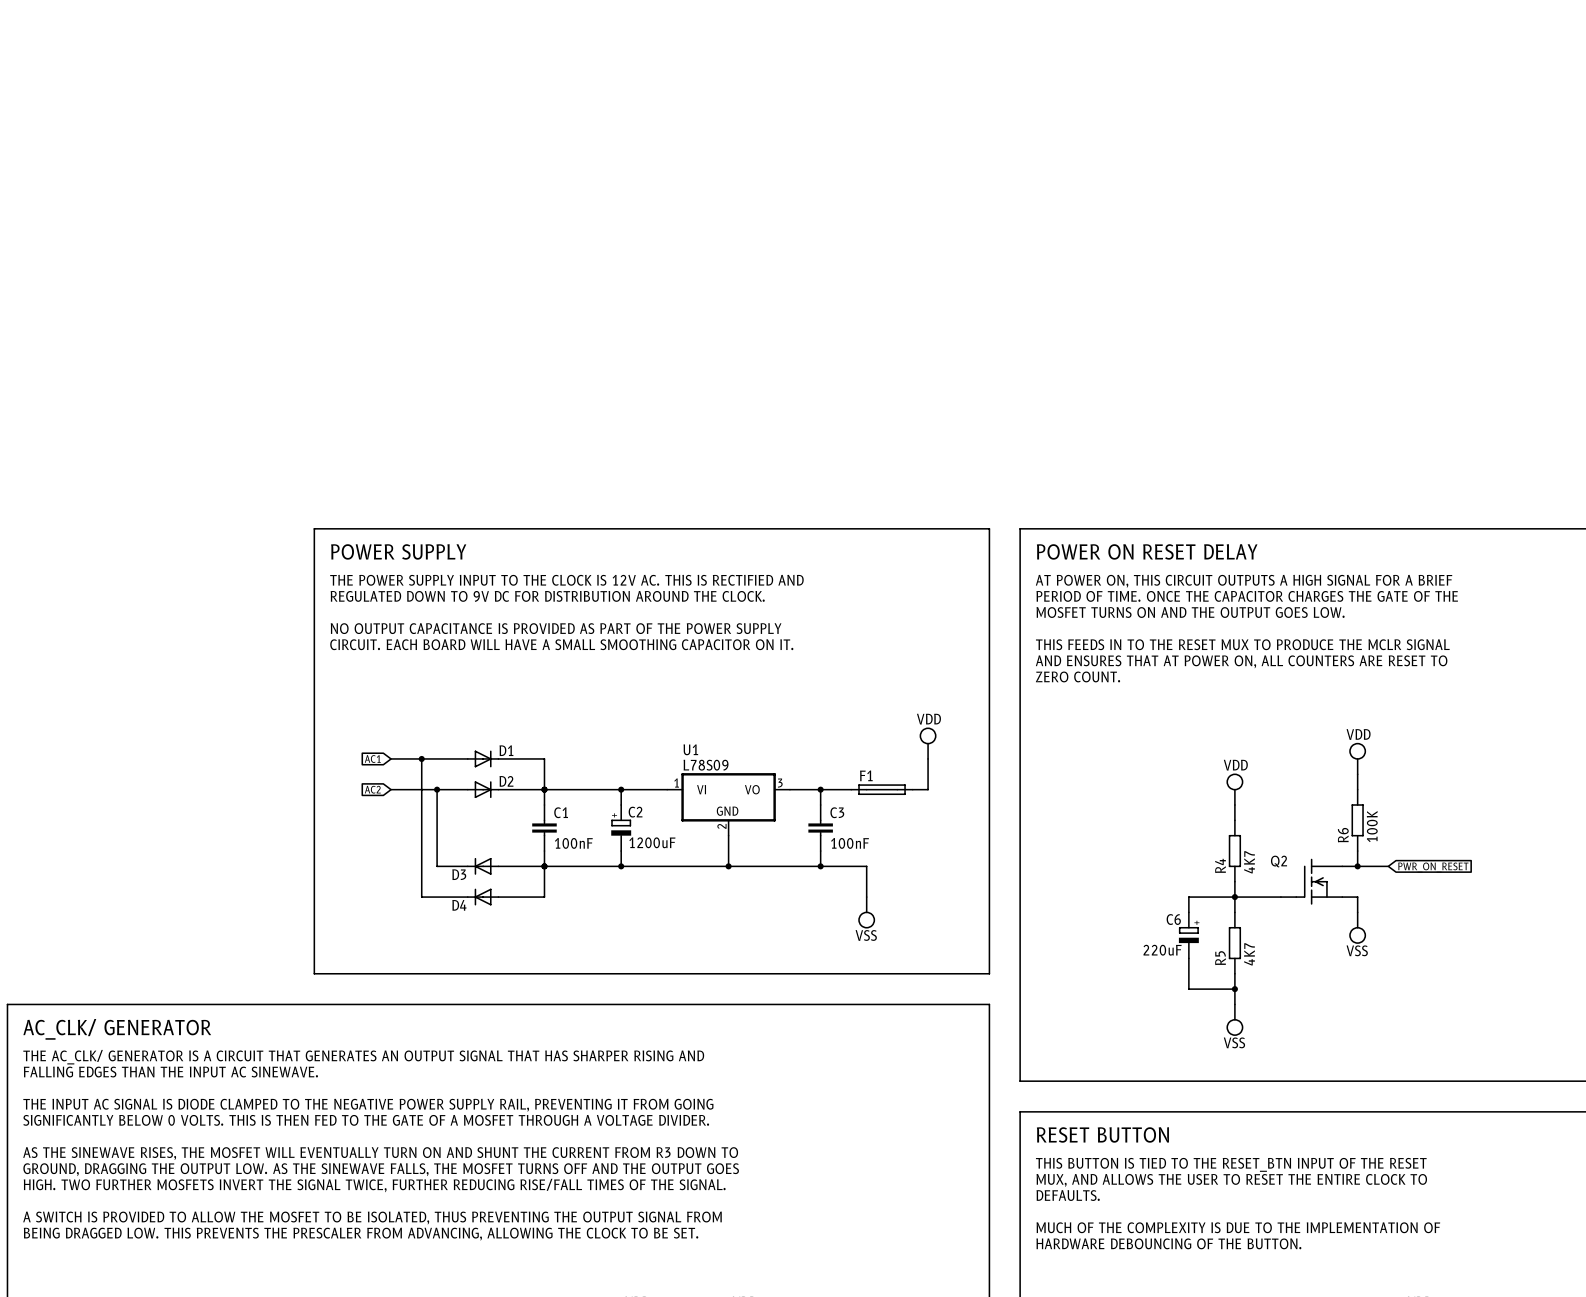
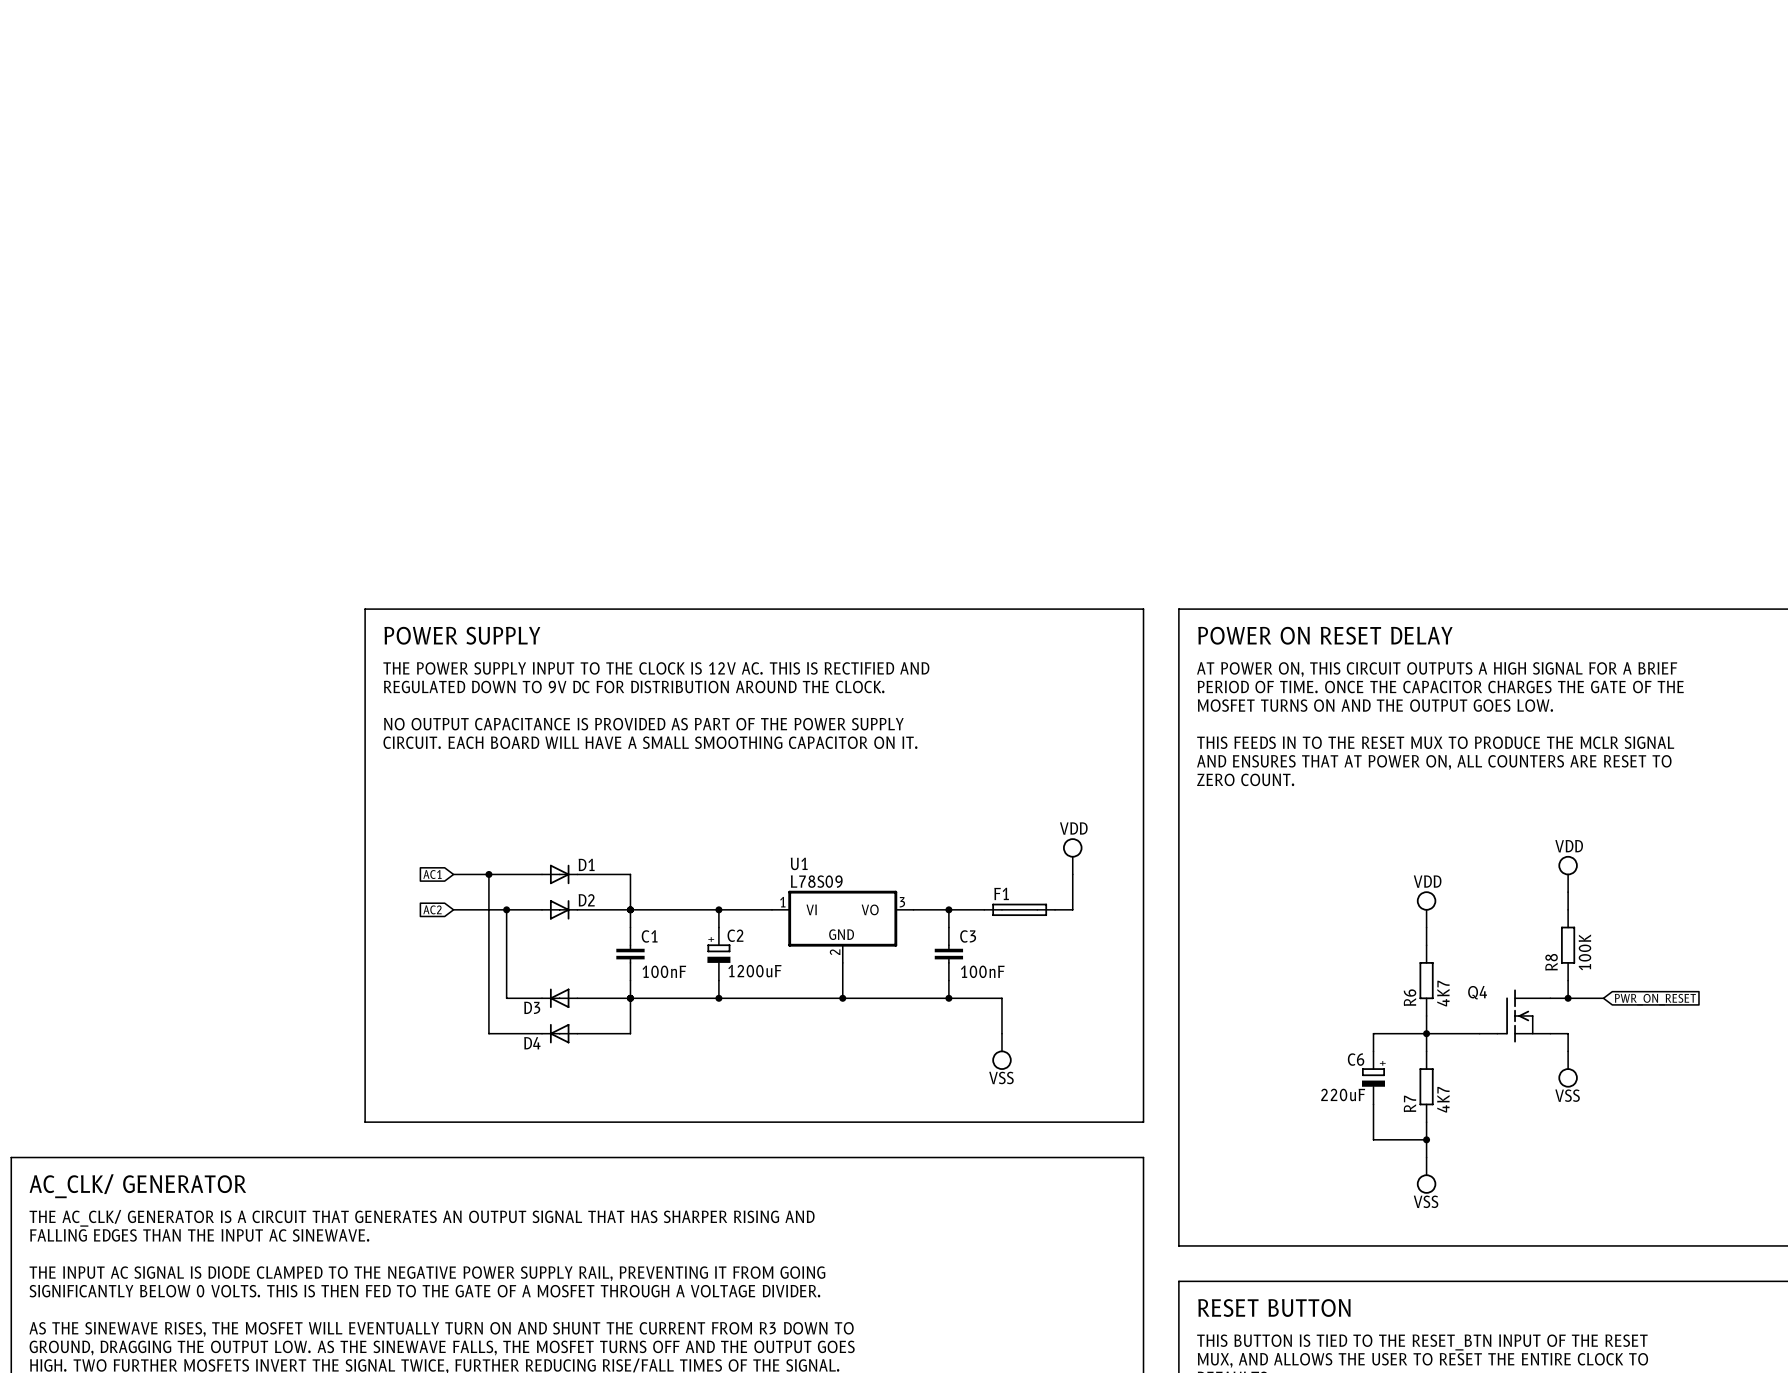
R6 name: R6 (1343, 835) -> R8 (1551, 962)
Q2 name: Q2 (1279, 861) -> Q4 (1477, 992)
R4 name: R4 (1220, 865) -> R6 (1410, 997)
R5 name: R5 (1220, 958) -> R7 (1409, 1103)

